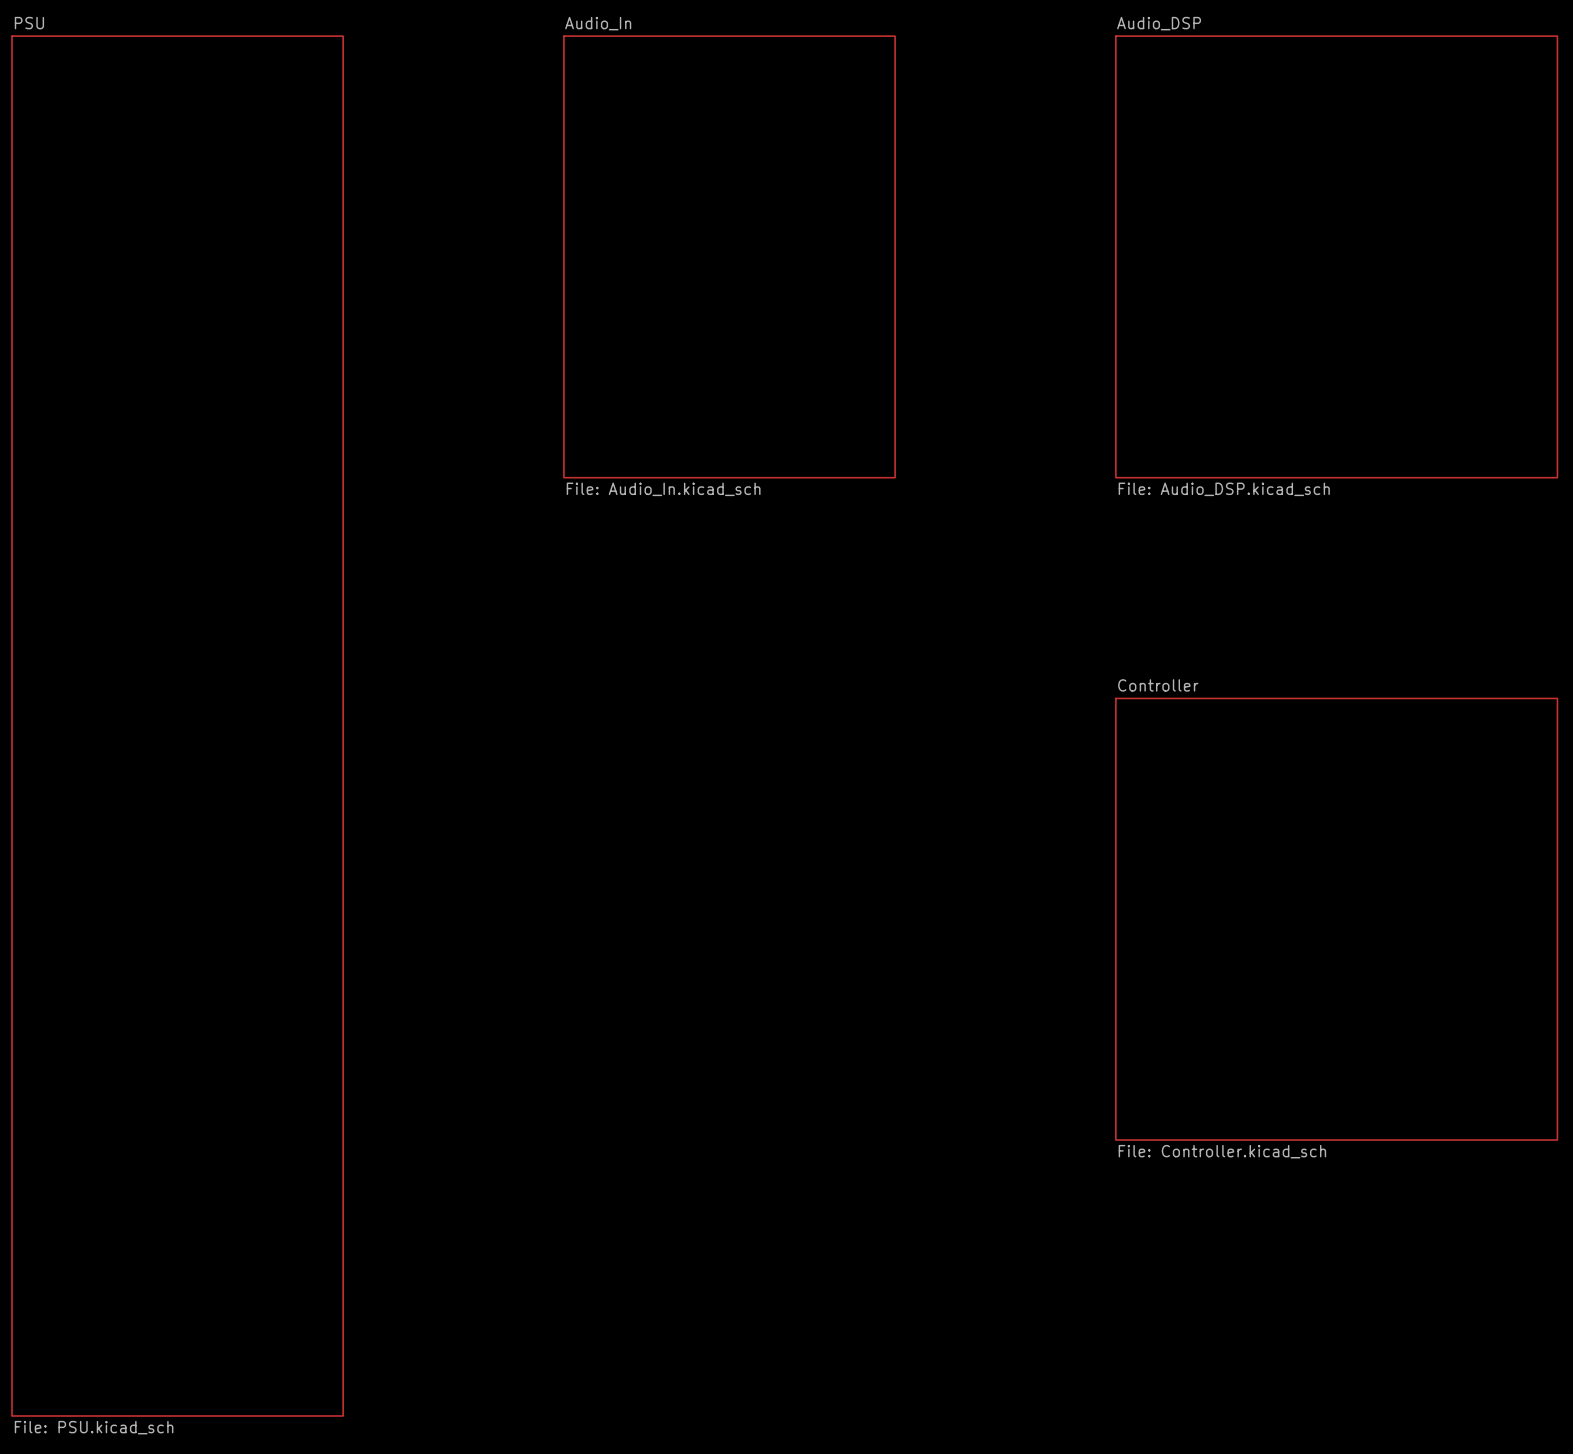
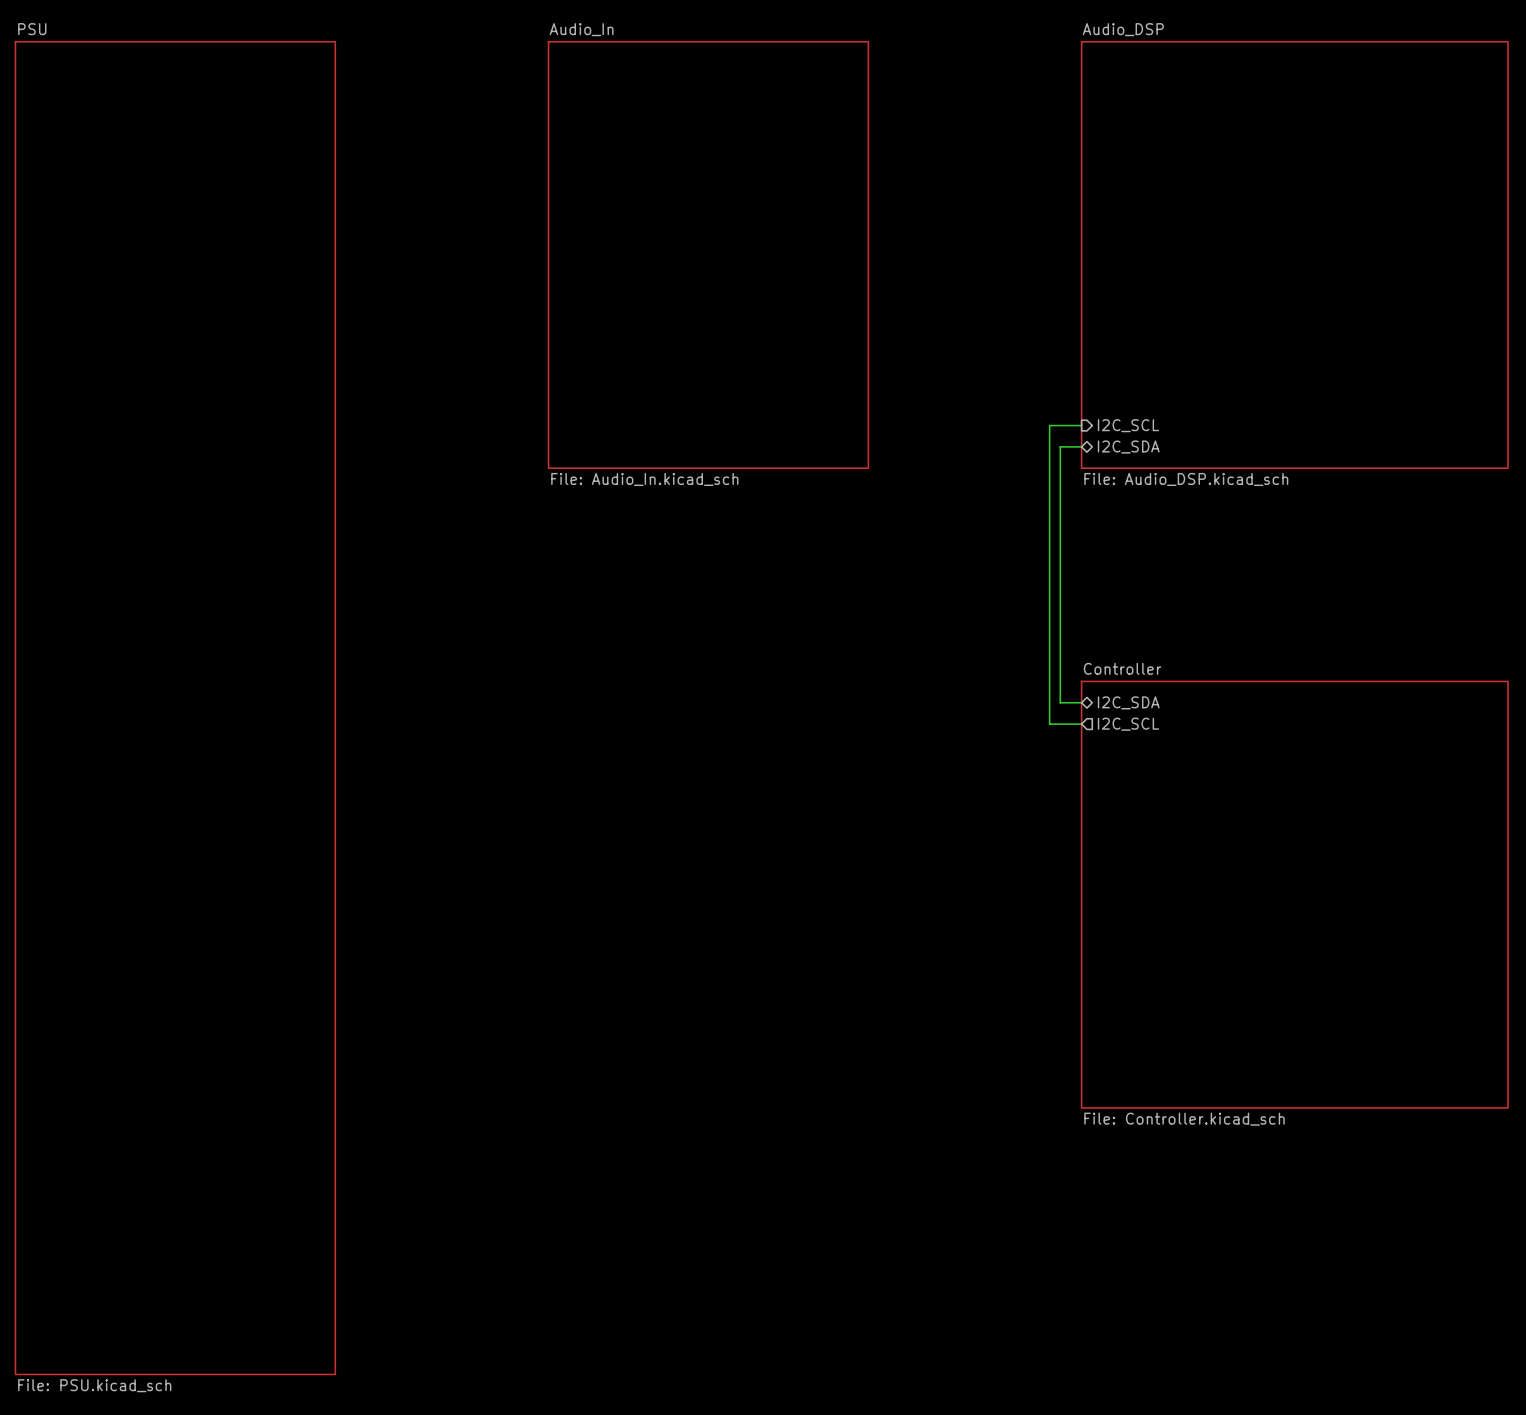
wire: none -> (1081, 425) (1049, 425) (1049, 724) (1081, 724)
sheet pin: none -> I2C_SCL (1128, 425)
wire: none -> (1081, 446) (1060, 446) (1060, 702) (1081, 702)
sheet pin: none -> I2C_SDA (1128, 447)
sheet pin: none -> I2C_SDA (1128, 702)
sheet pin: none -> I2C_SCL (1128, 724)

